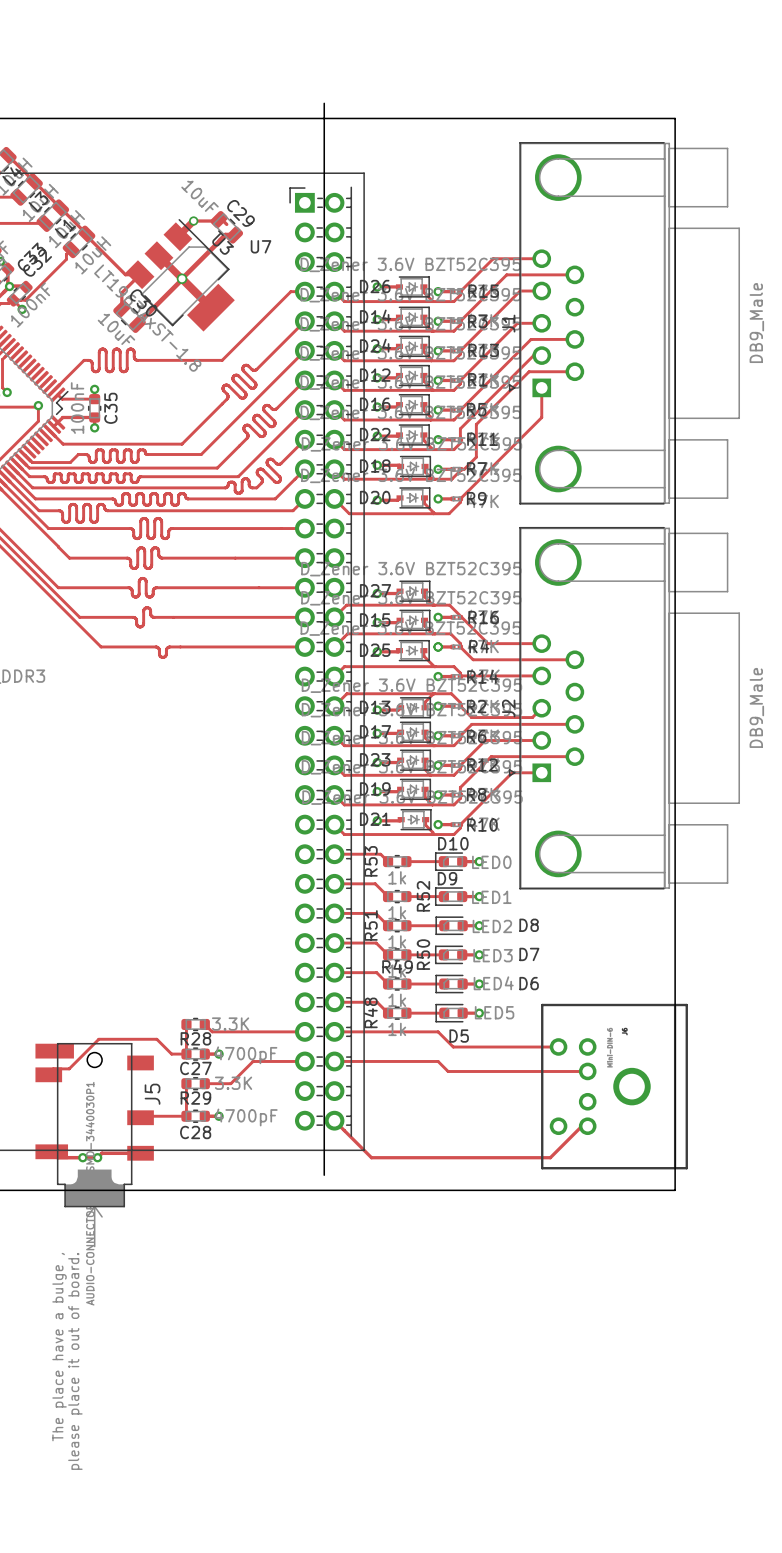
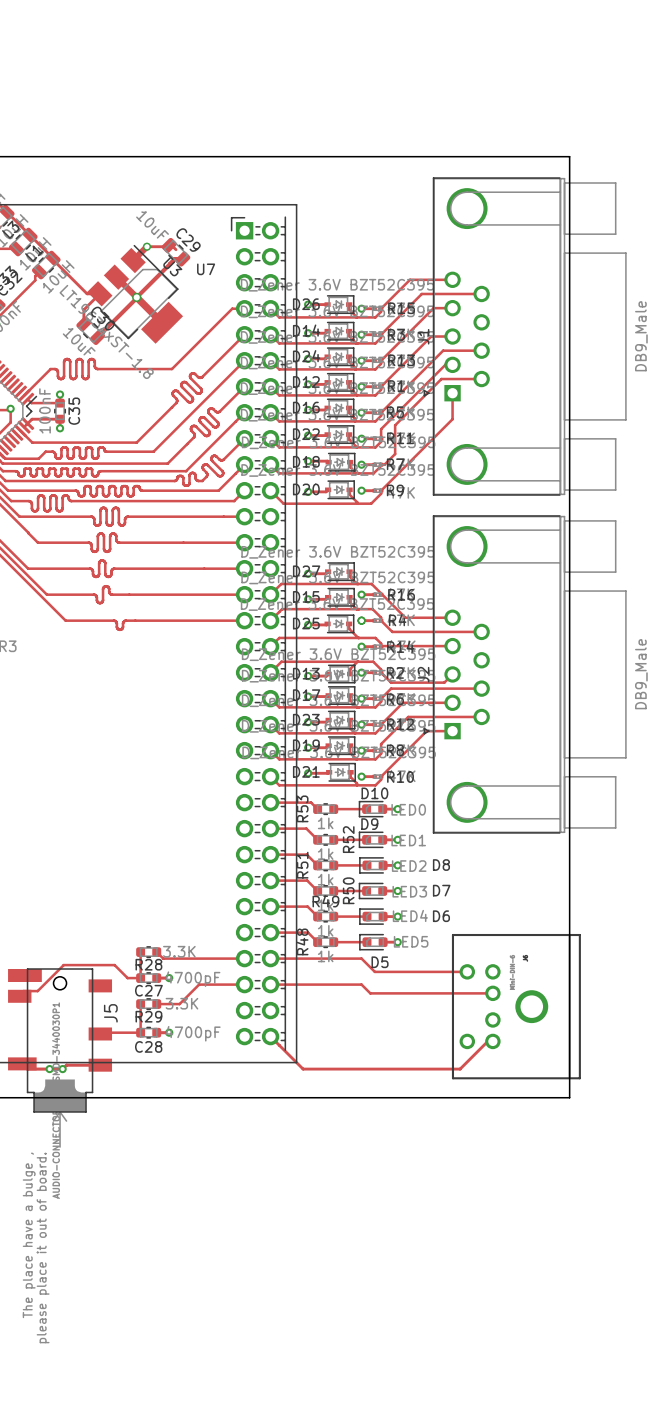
board edge: (324, 103) (324, 1175) -> none

